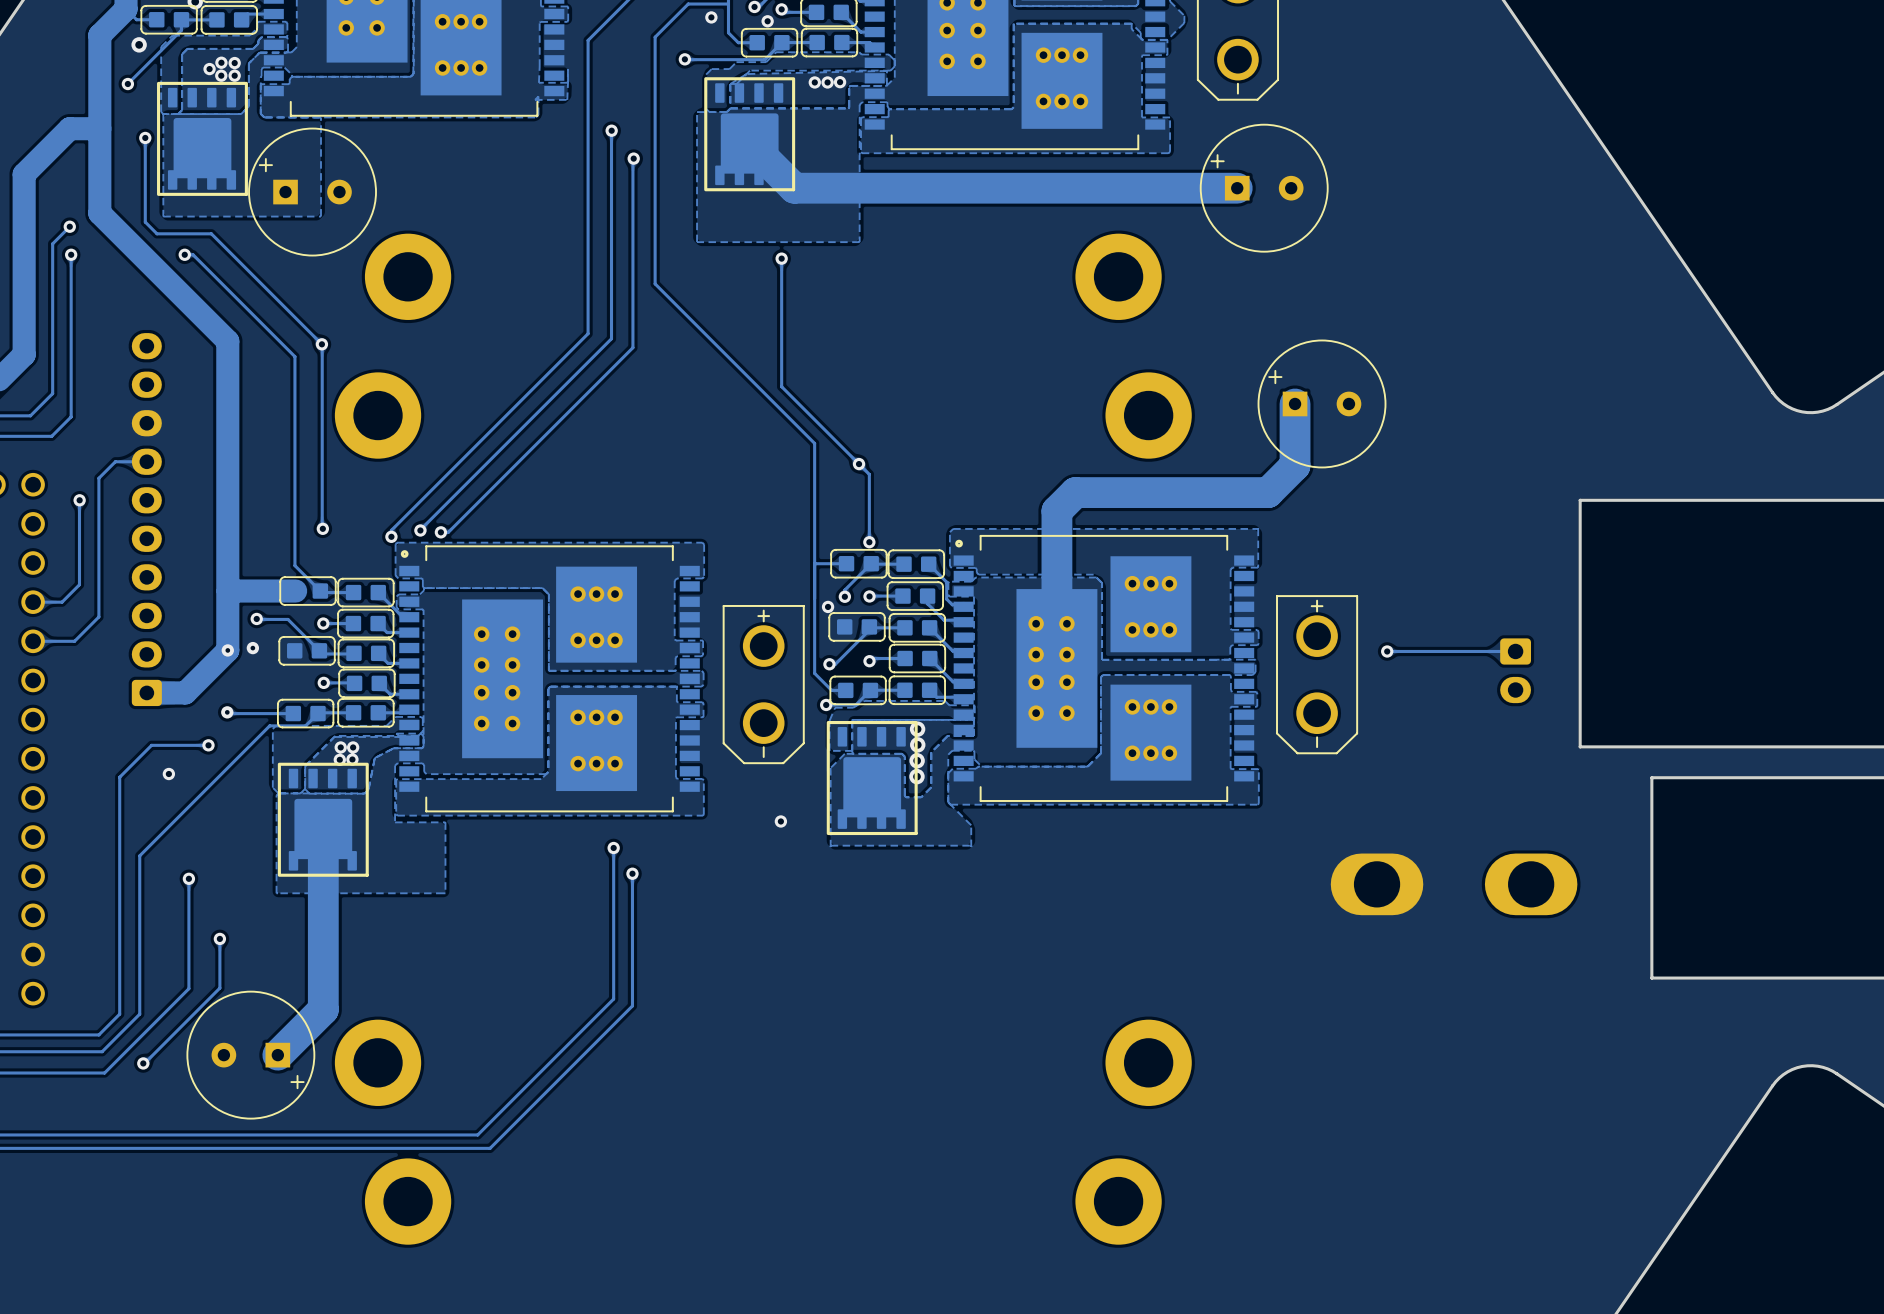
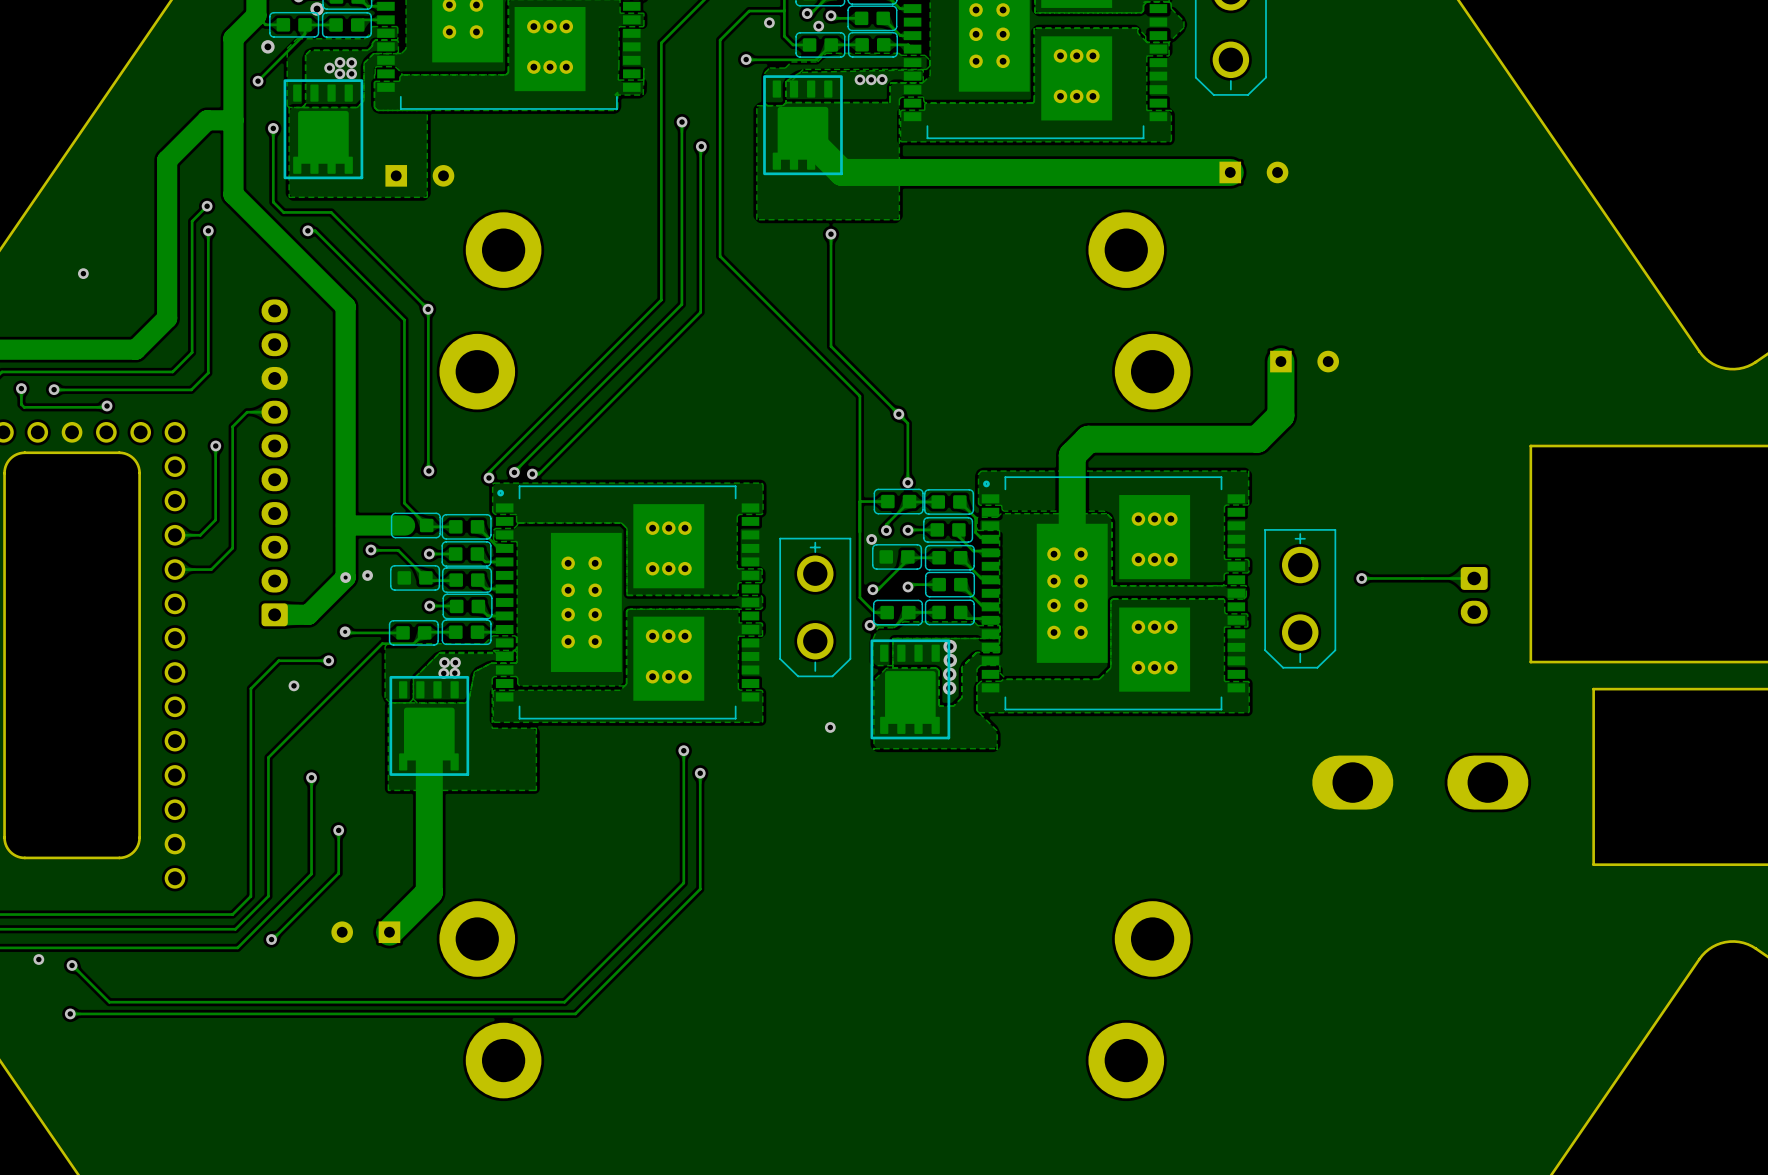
part side: bottom (1264, 188) -> top (1253, 172)
part side: bottom (312, 192) -> top (419, 175)
part side: bottom (1322, 403) -> top (1304, 361)
part side: bottom (250, 1055) -> top (365, 932)

